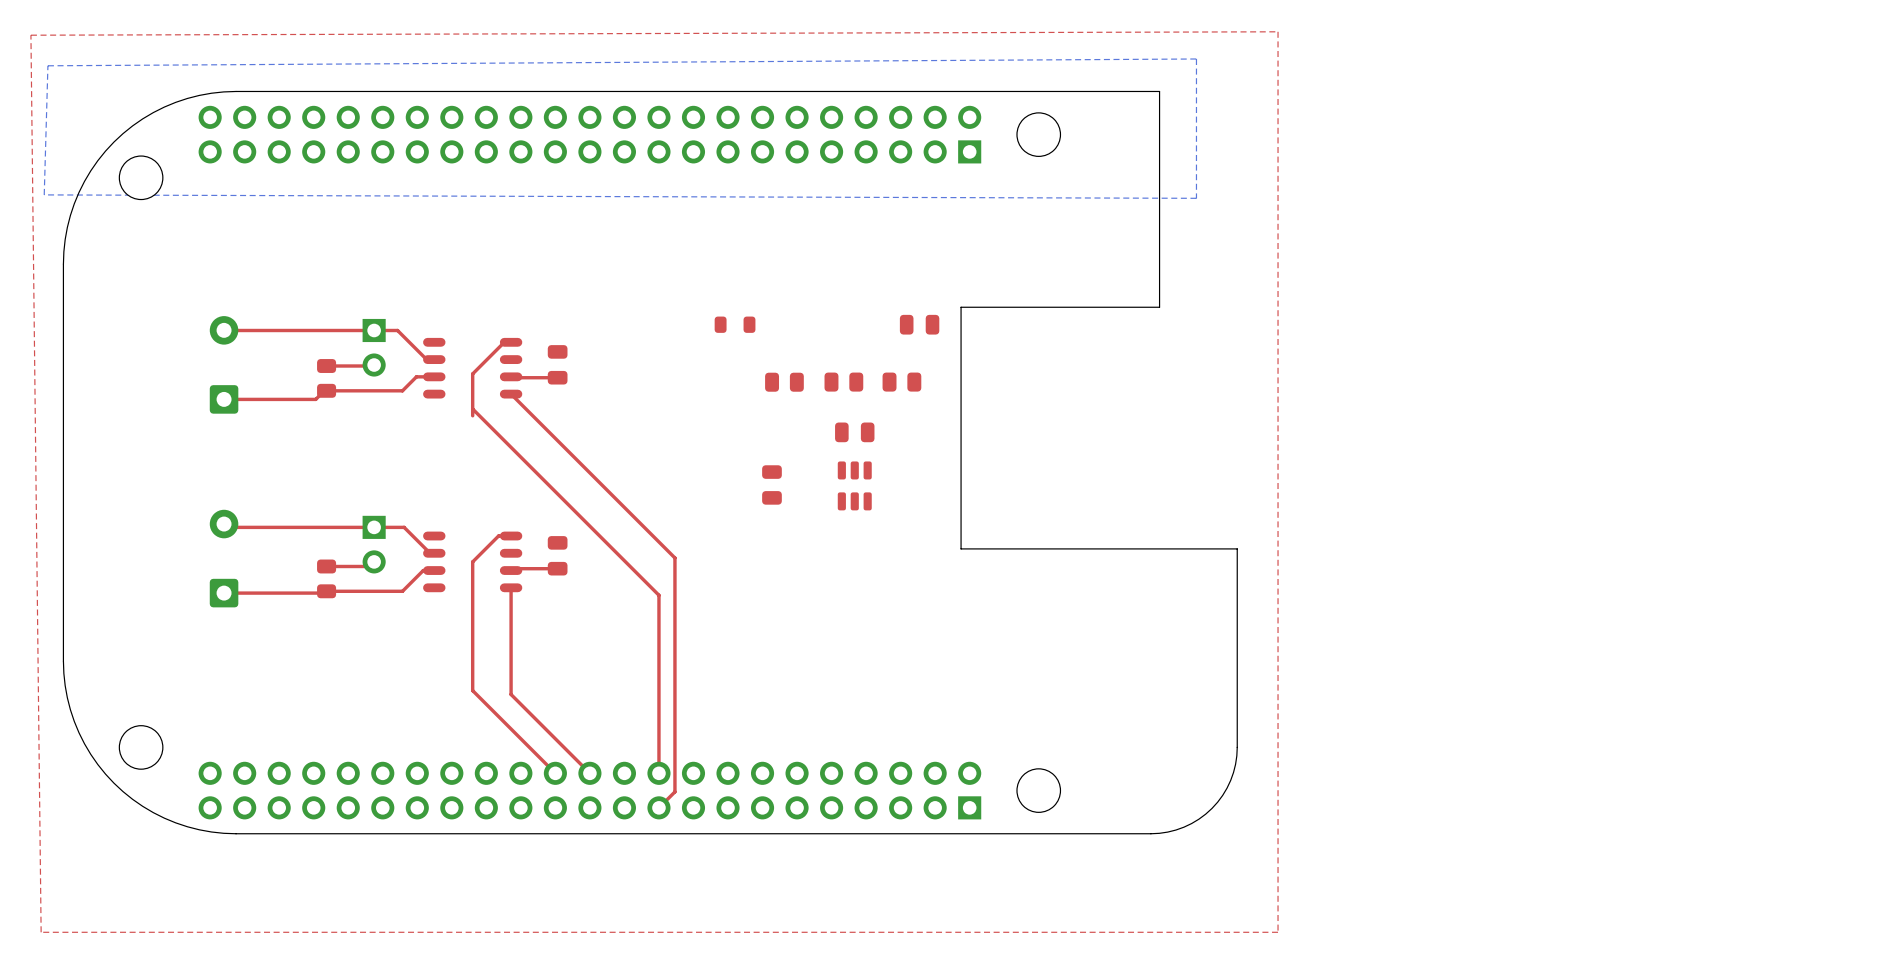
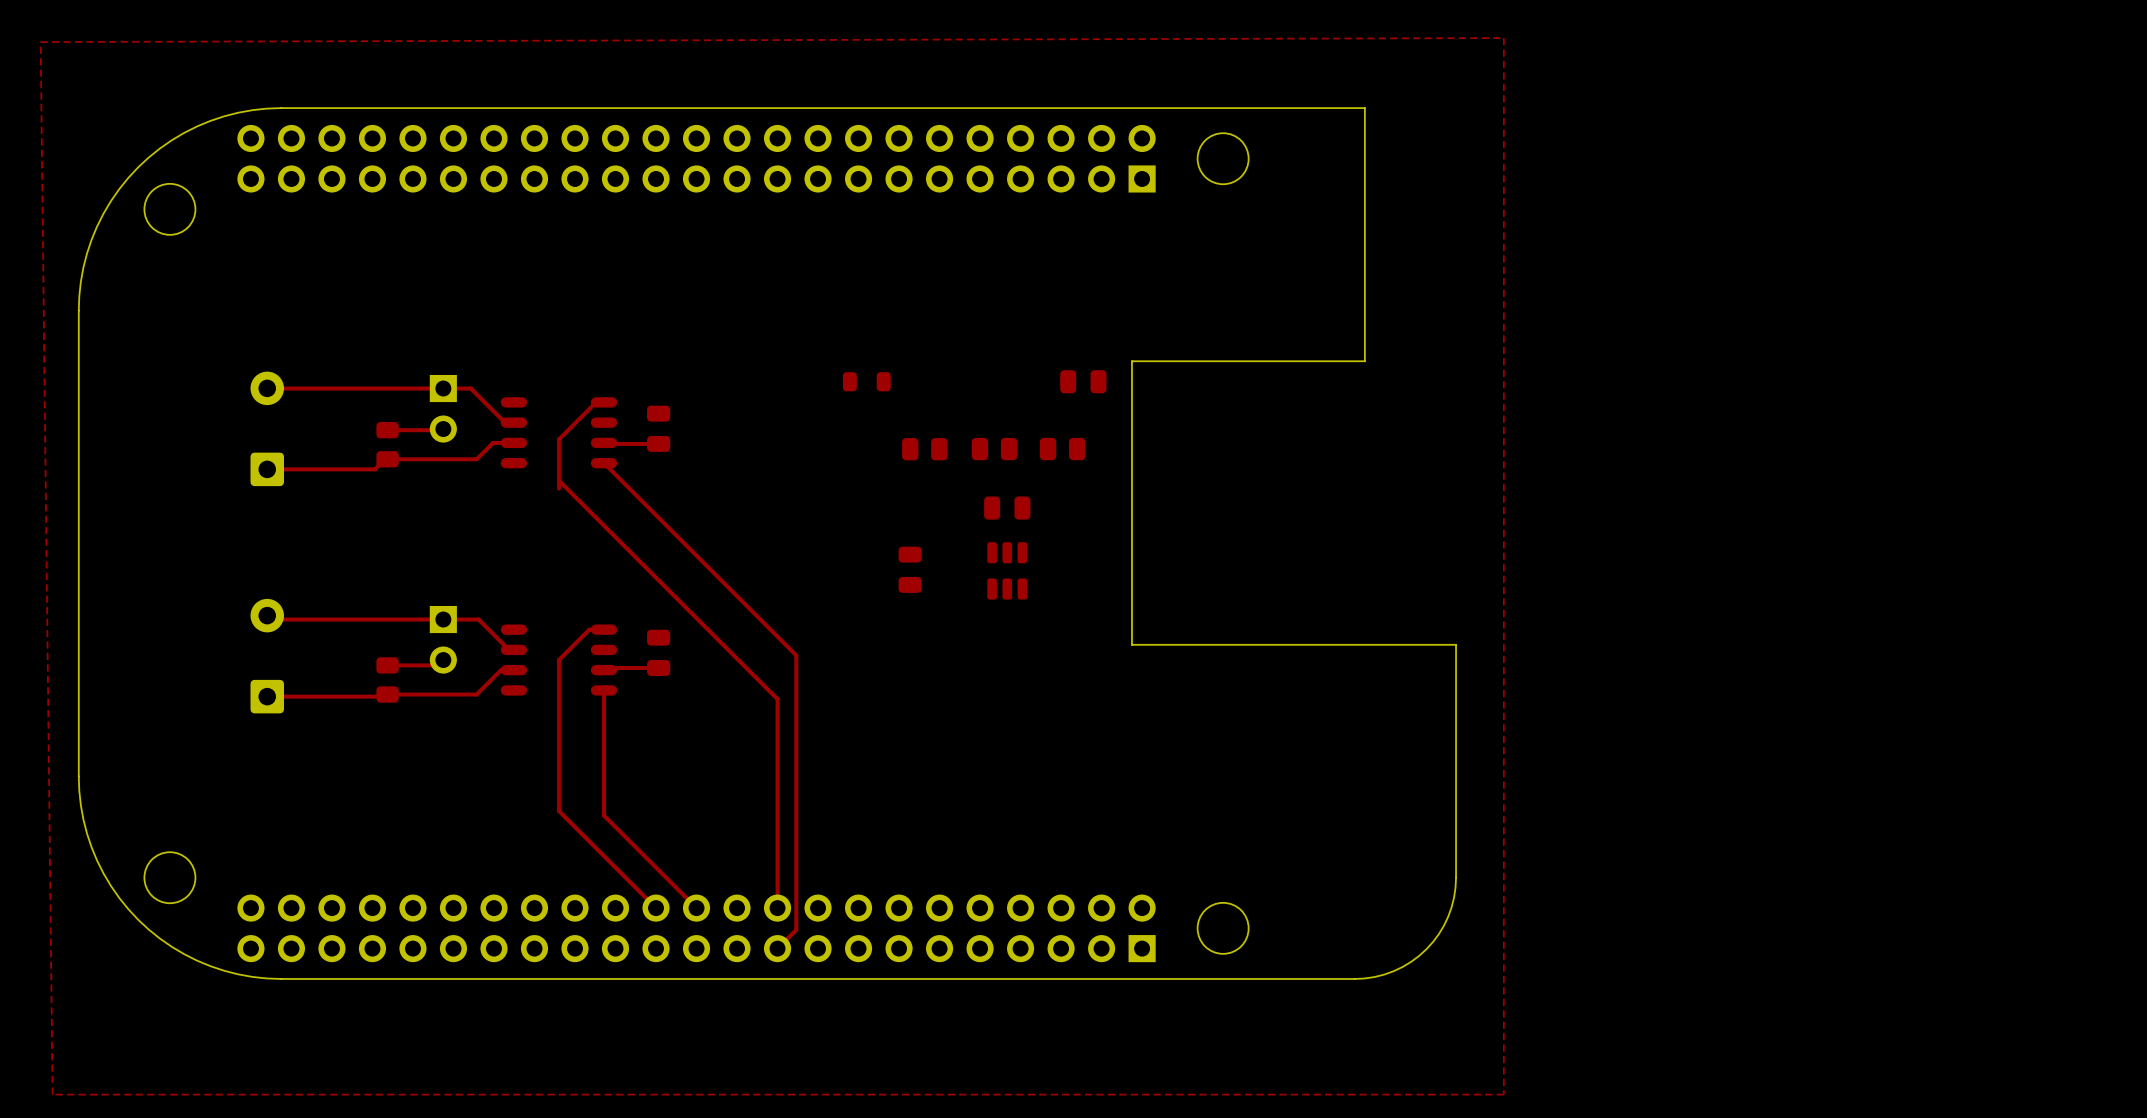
bottom zone outline: (1196, 58) (1196, 198) (44, 194) (47, 65) (1196, 58) -> none

